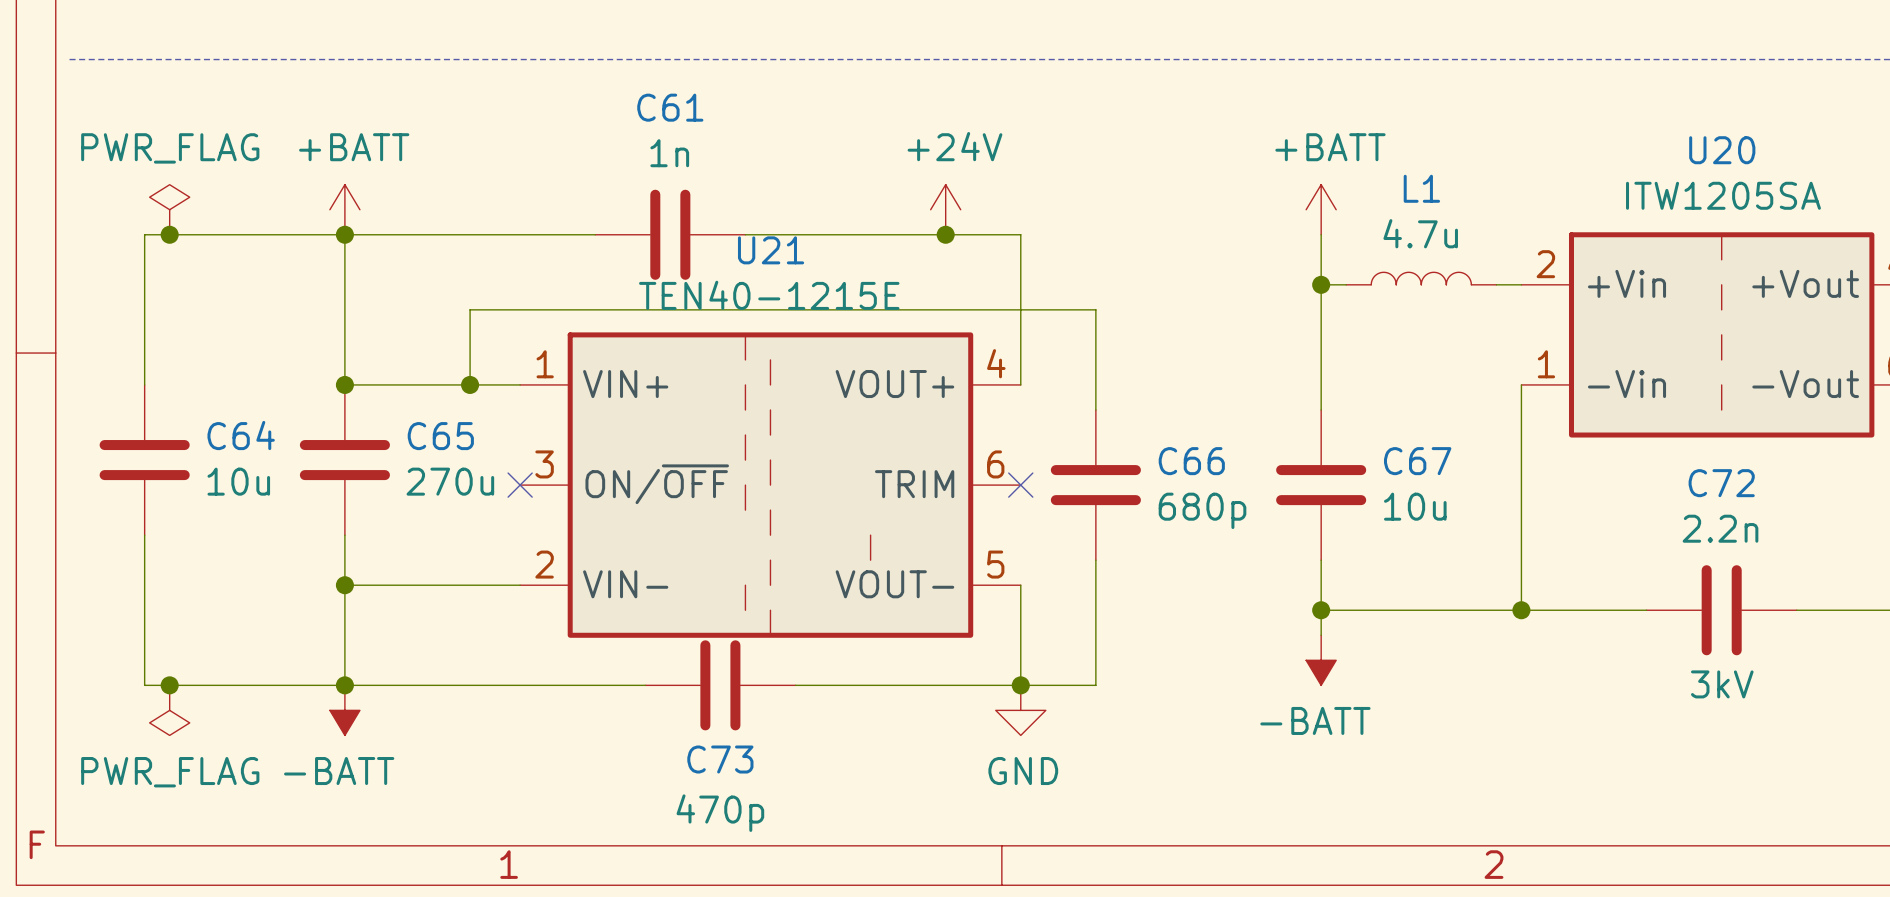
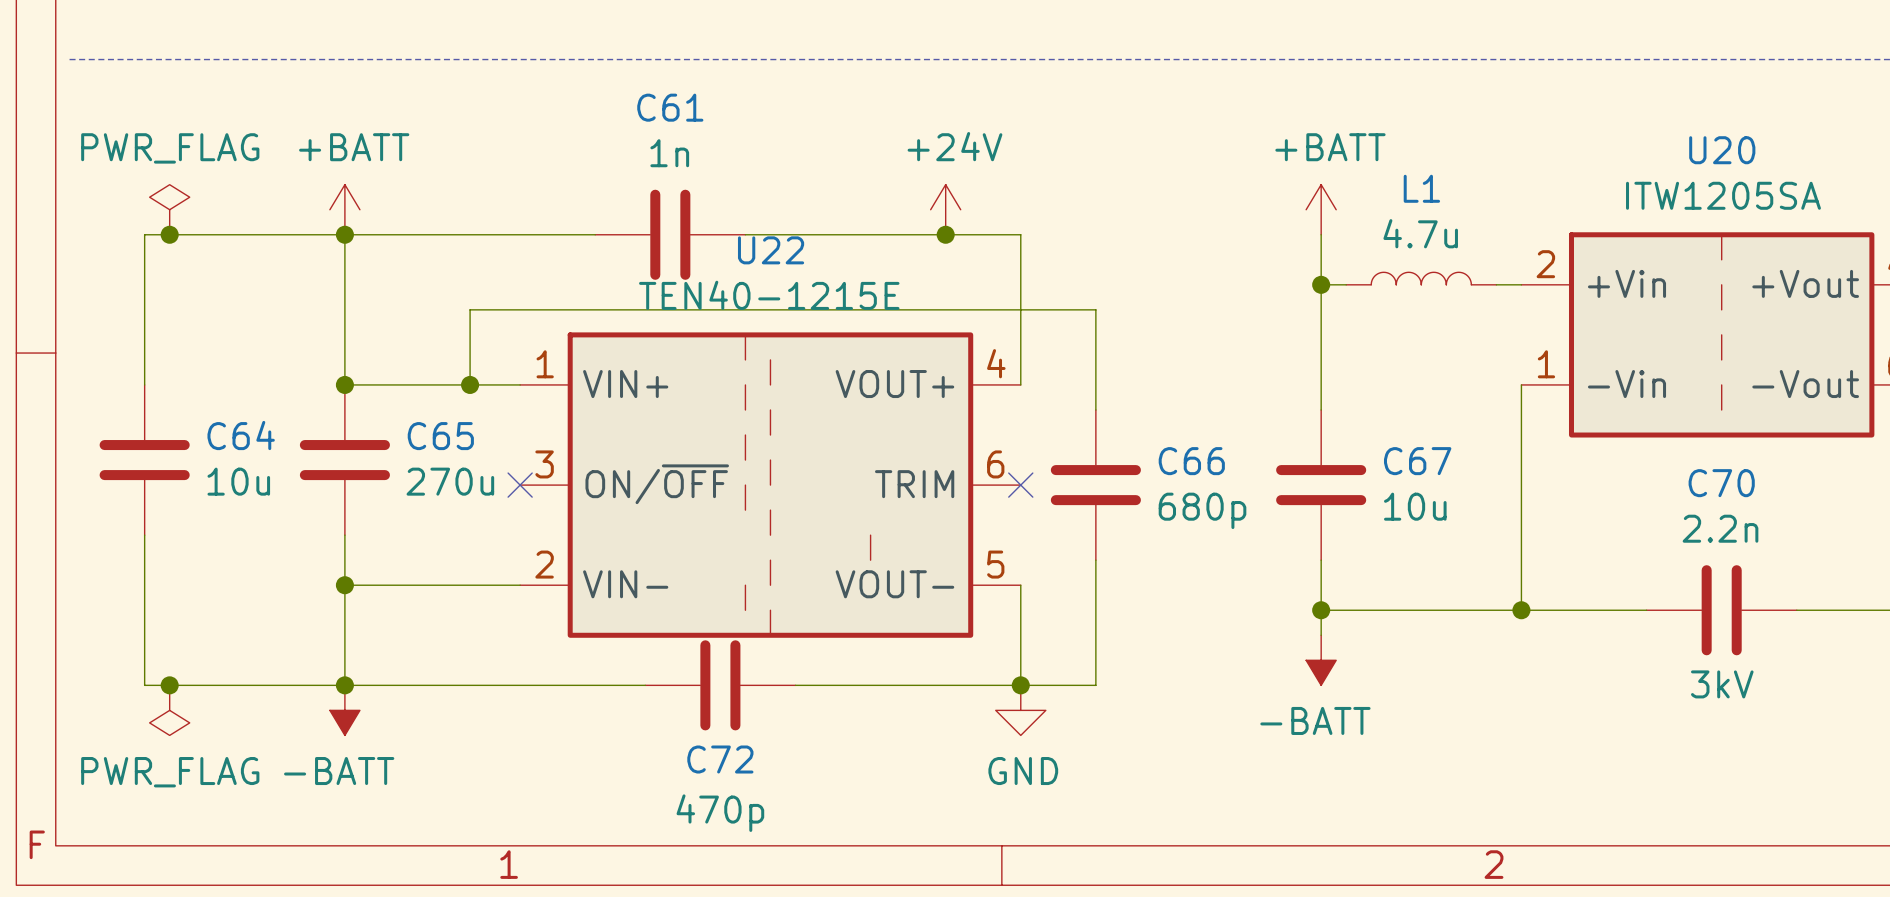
U21 name: U21 (771, 250) -> U22 (771, 250)
C72 name: C72 (1721, 483) -> C70 (1721, 483)
C73 name: C73 (720, 759) -> C72 (720, 759)

